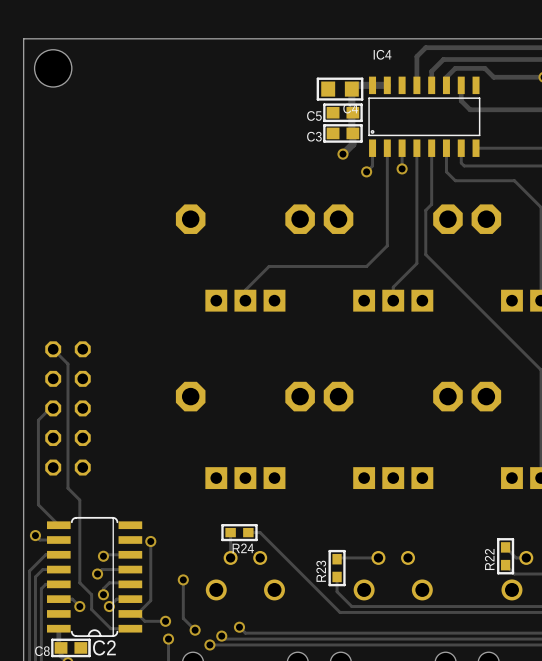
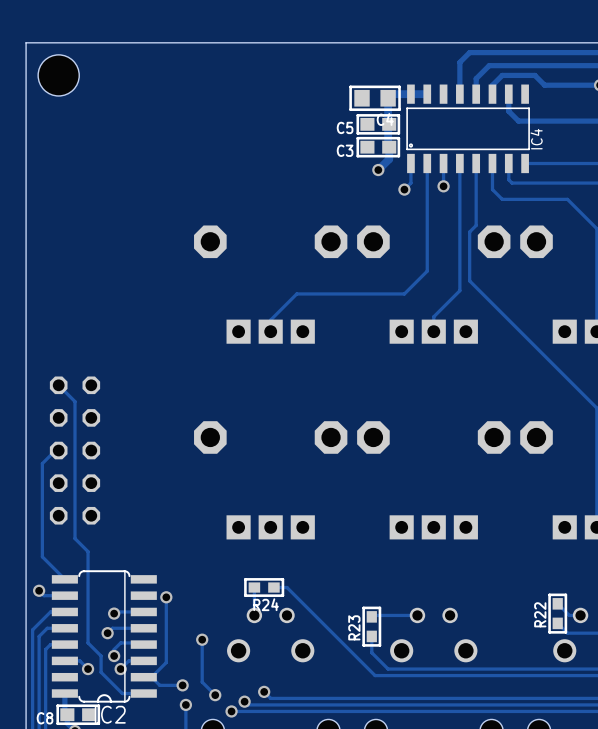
IC4 name rotation: 0° (382, 54) -> 90° counterclockwise (536, 139)
IC4 name position: IC4 (382, 54) -> IC4 (536, 139)

